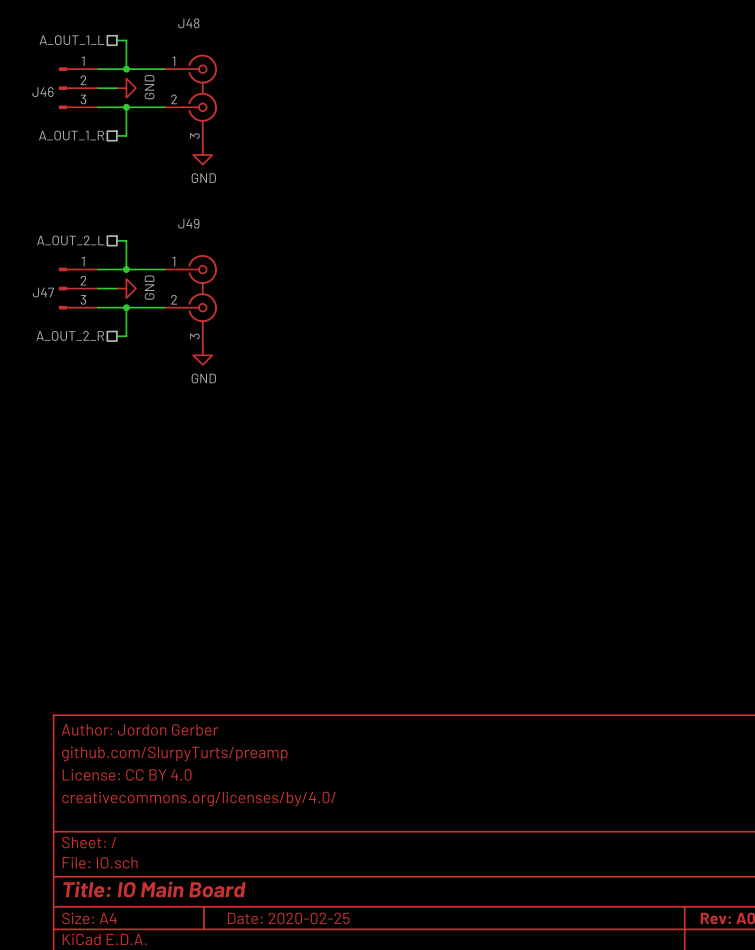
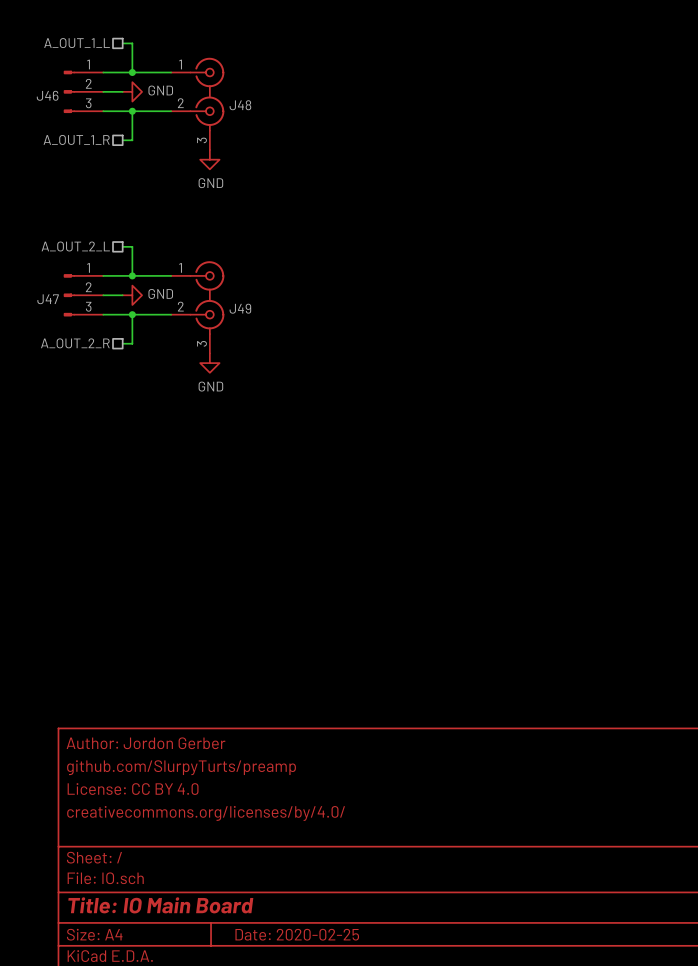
J48 name position: J48 (188, 23) -> J48 (240, 105)
power symbol text rotation: 0° (149, 87) -> 90° clockwise (160, 90)
J49 name position: J49 (188, 223) -> J49 (240, 308)
power symbol text rotation: 0° (149, 287) -> 90° clockwise (160, 293)

